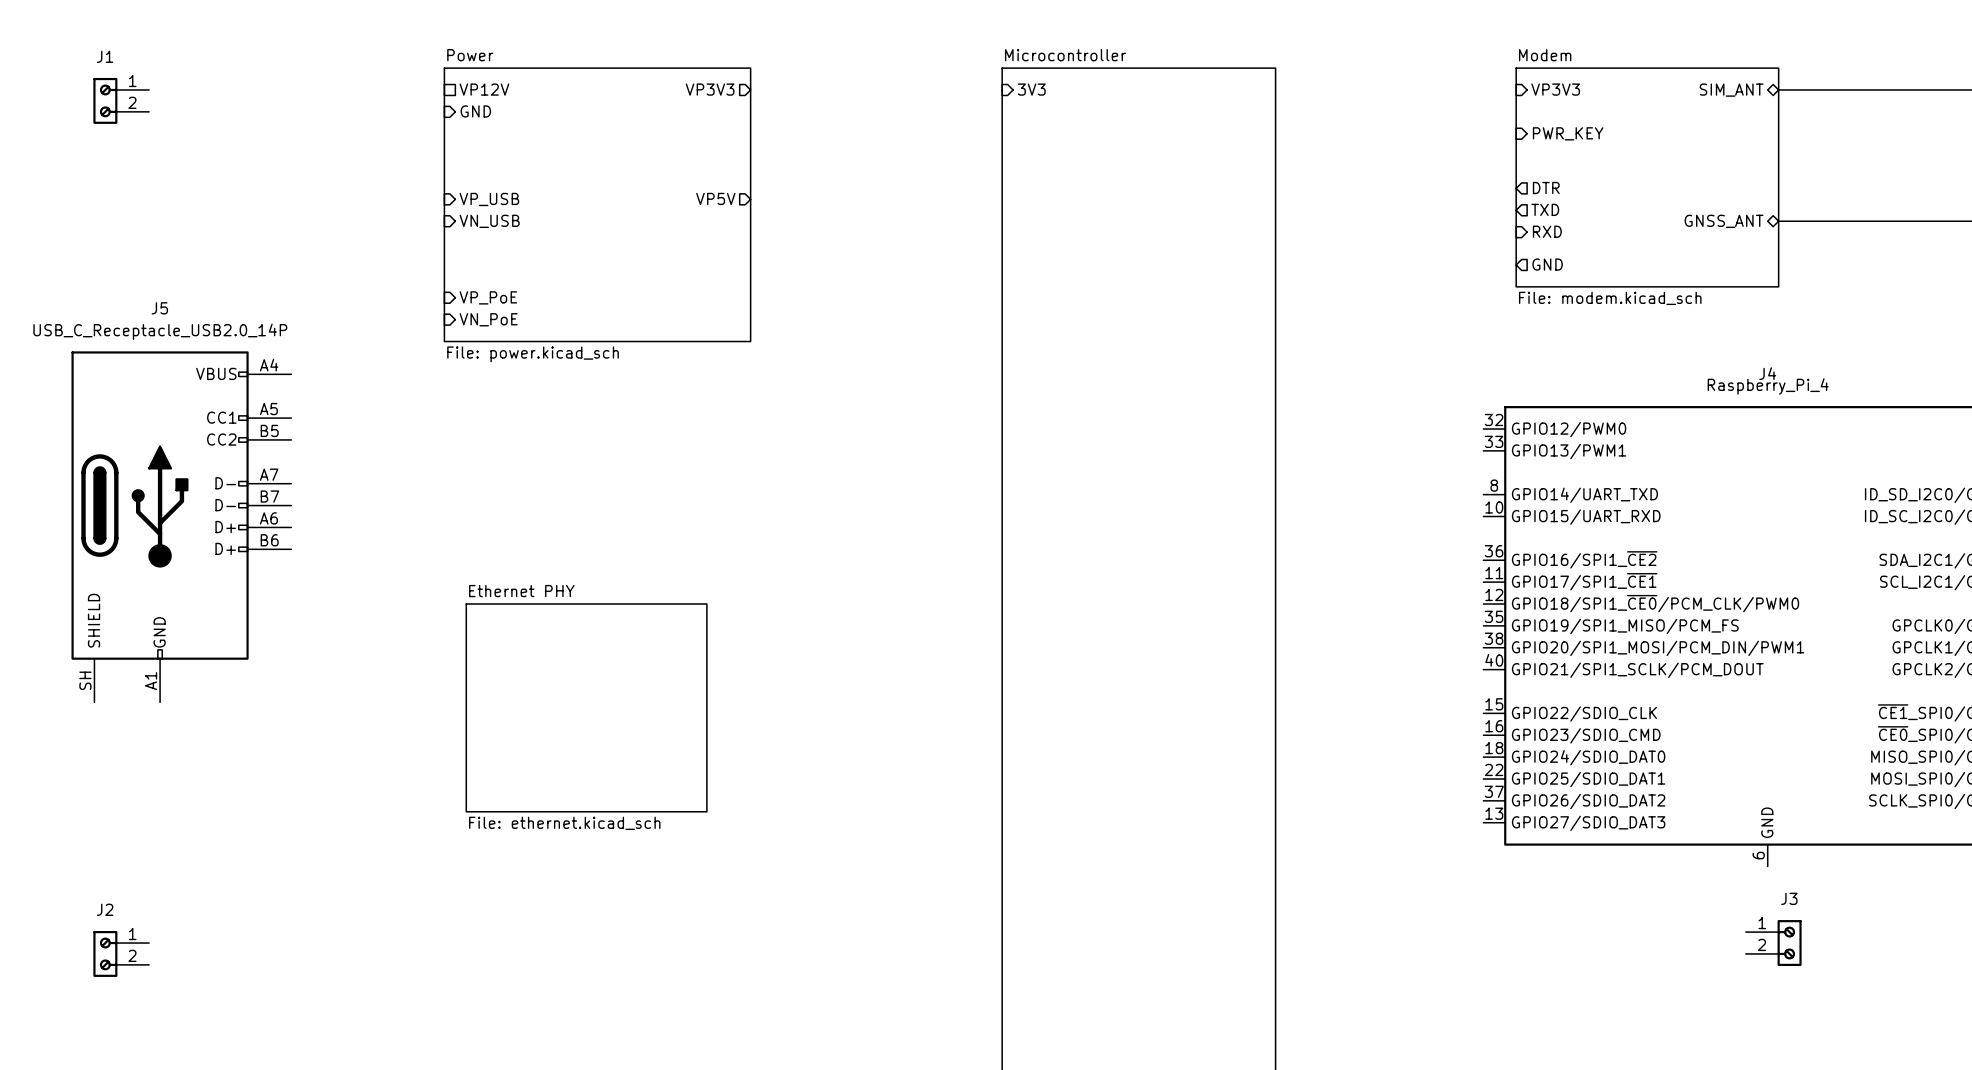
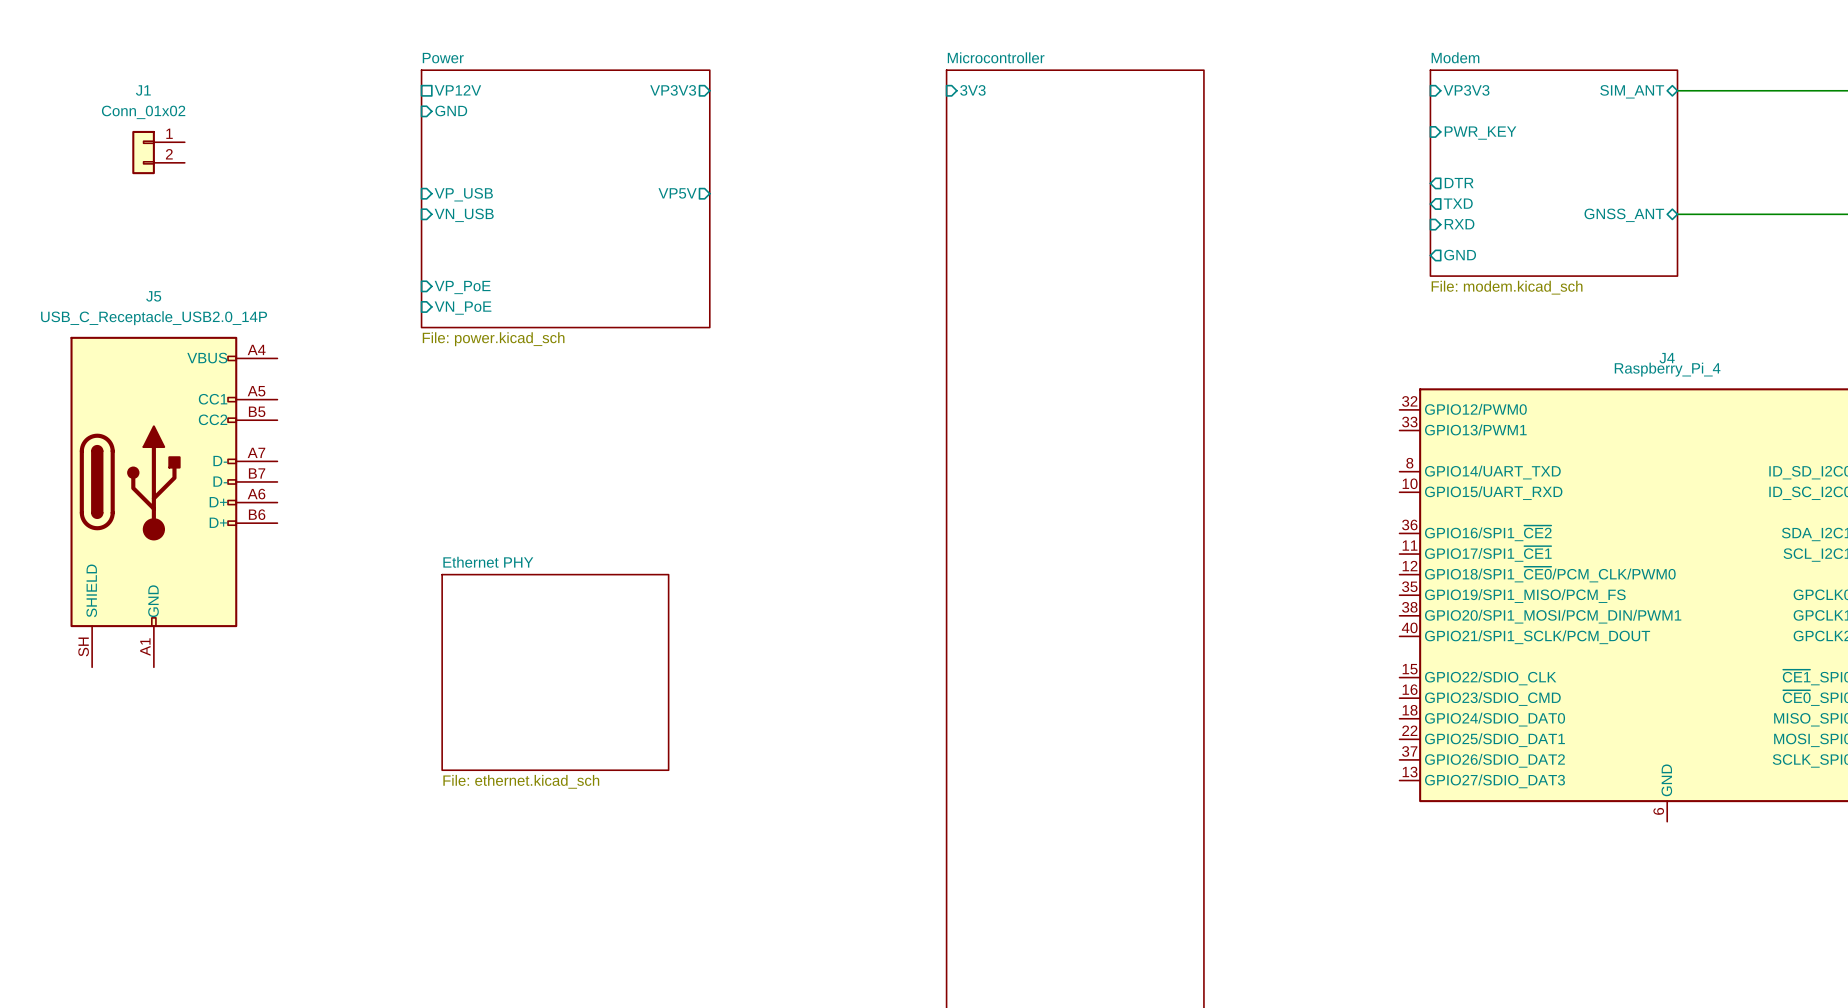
J1 name position: J1 (105, 56) -> J1 (143, 90)
J1 symbol: [93, 77, 150, 124] -> [132, 130, 185, 175]
J1 value: none -> Conn_01x02 (143, 112)
J3: (1773, 943) -> none
J2: (121, 953) -> none

